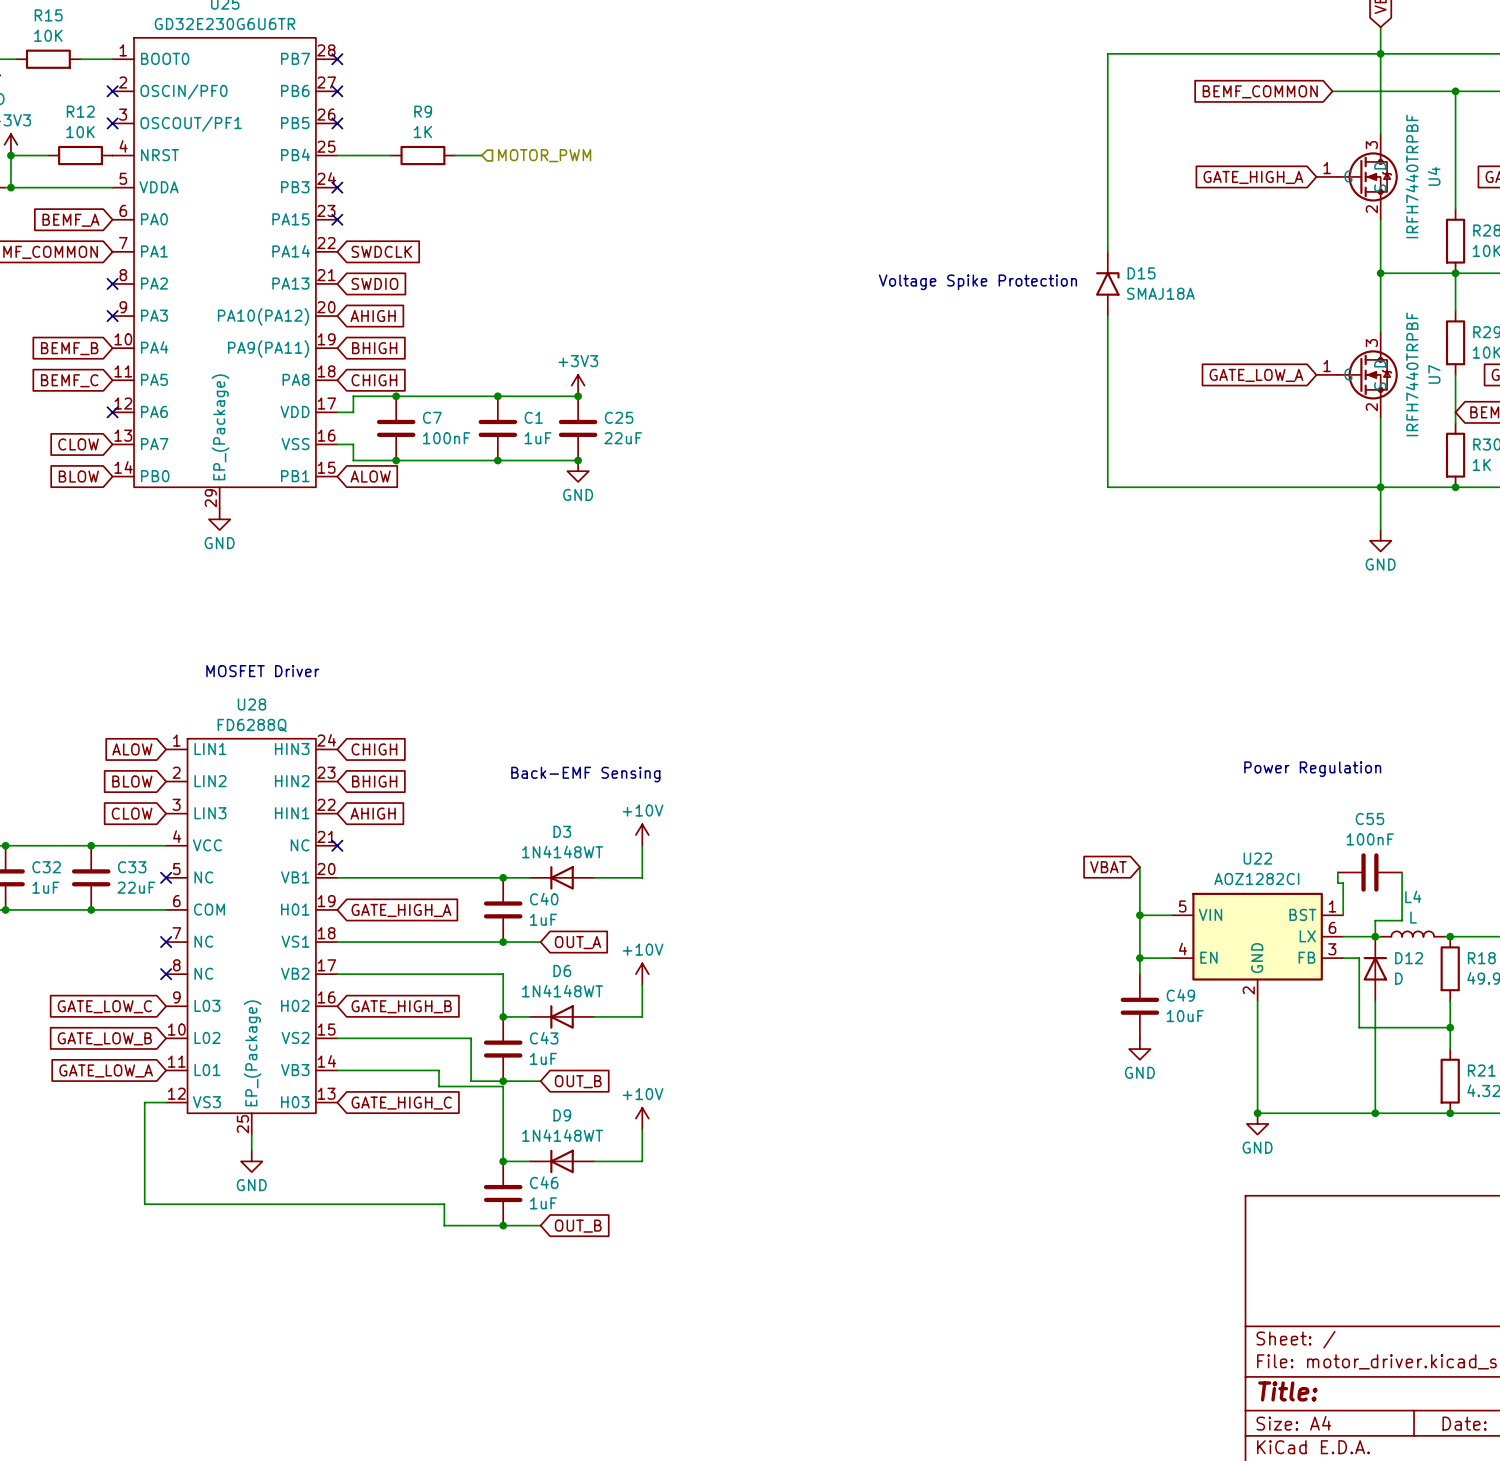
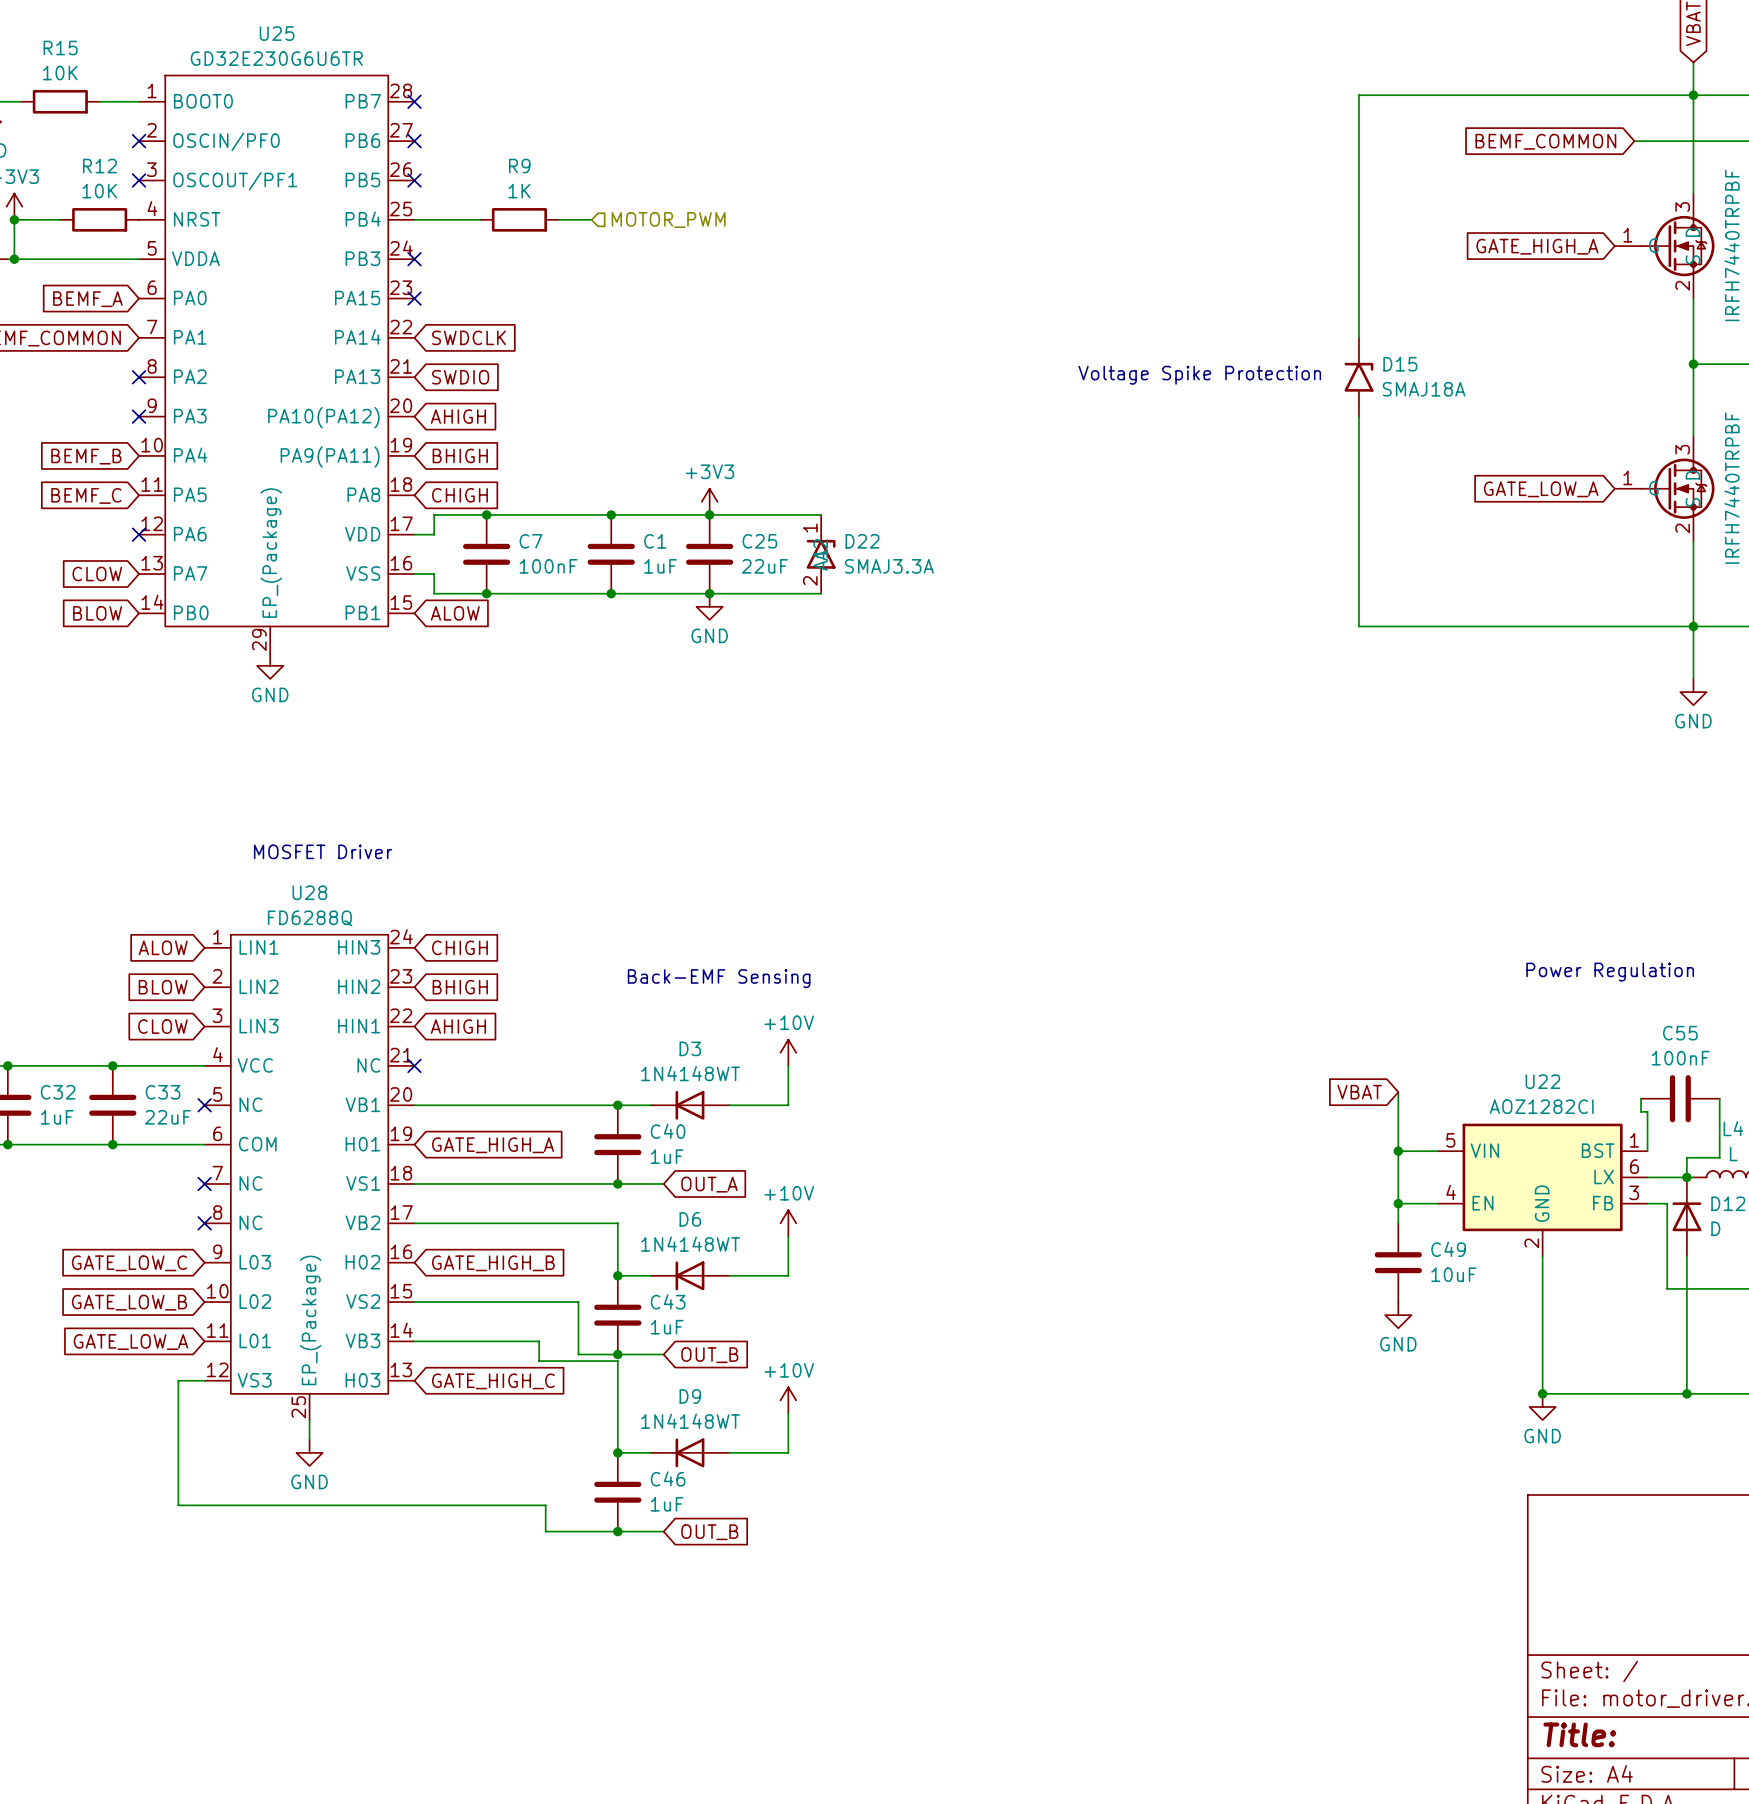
wire: none -> (709, 514) (821, 514)
D22: none -> SMAJ3.3A (821, 554)
wire: none -> (709, 593) (821, 593)

